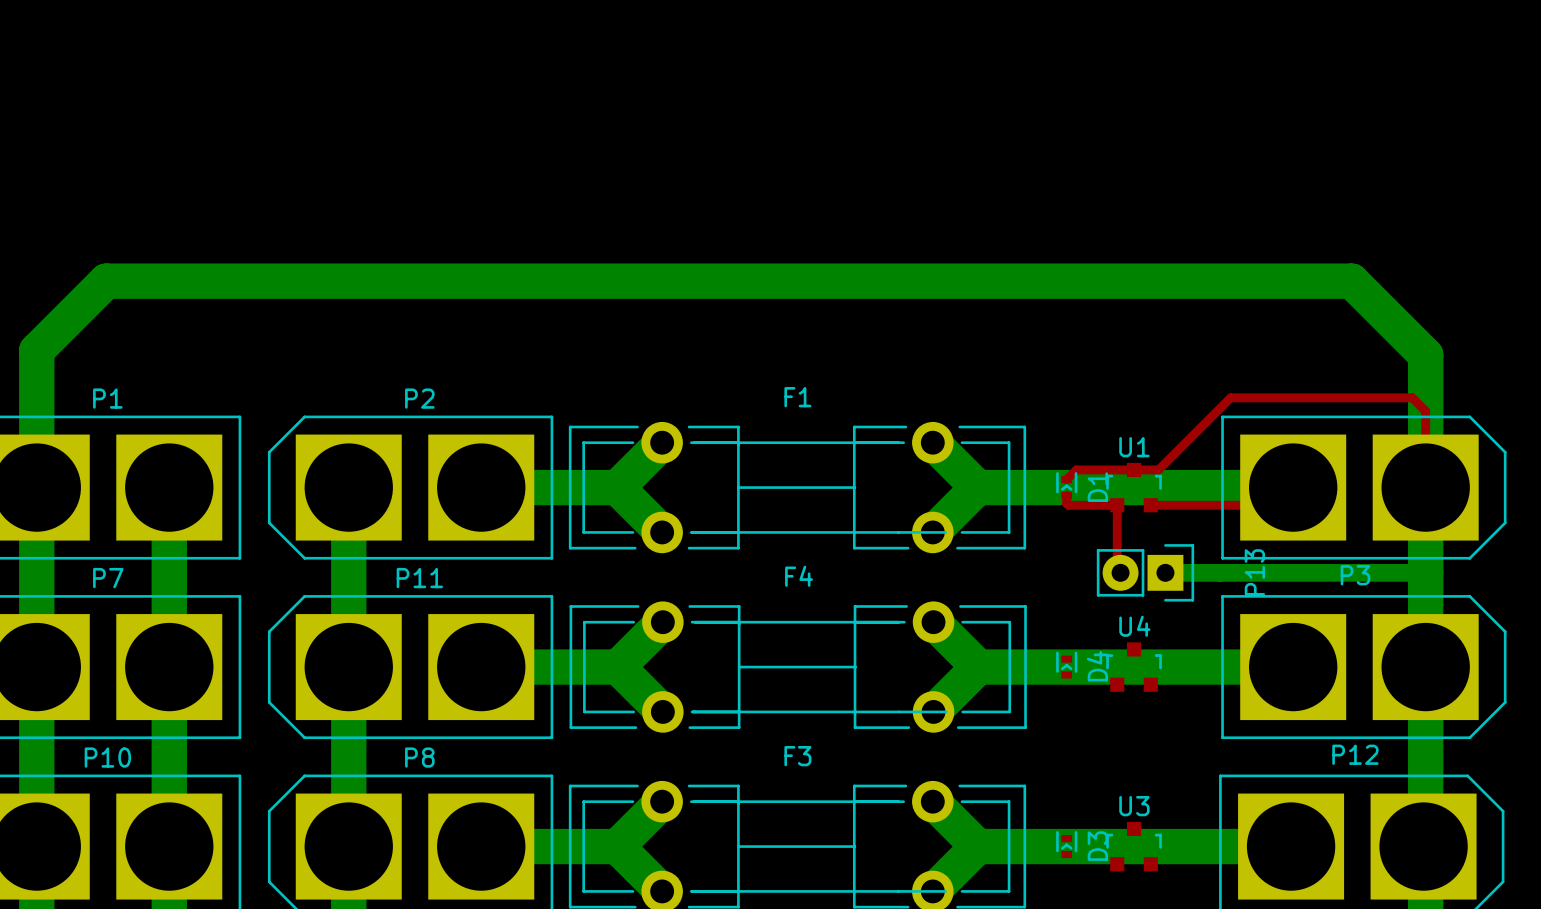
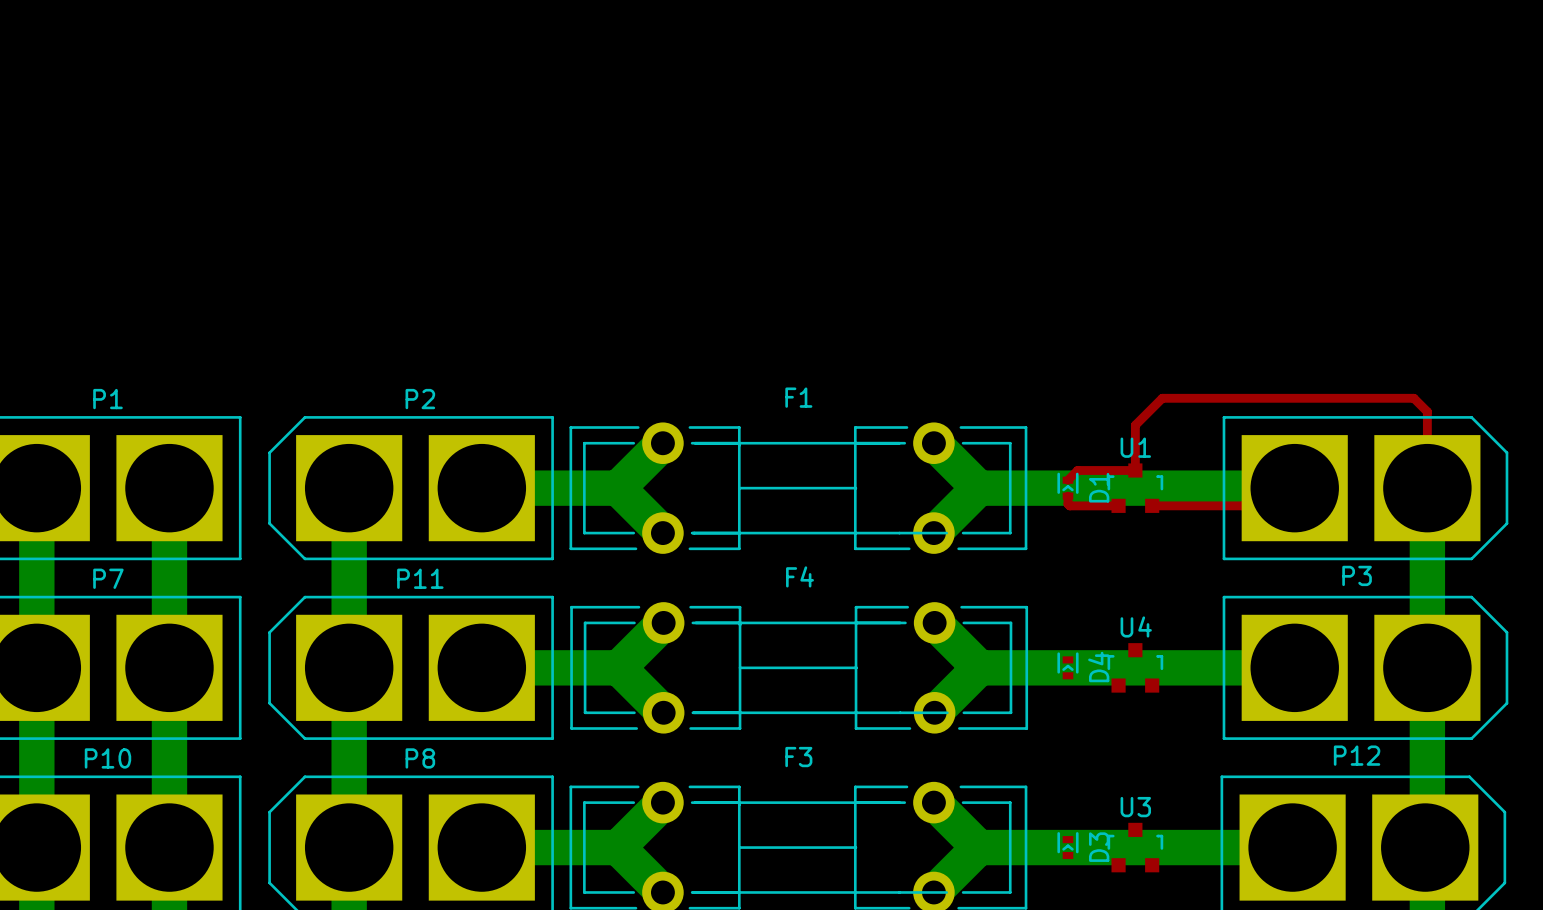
top track: (1230, 397) (1158, 469) (1134, 469) -> (1232, 398) (1162, 398) (1135, 425) (1135, 470)
bottom track: (36, 487) (36, 350) (106, 281) (1351, 281) (1425, 355) (1425, 487) -> none
top track: (1117, 505) (1117, 569) (1120, 572) -> none
P13: (1145, 572) -> none
bottom track: (1165, 572) (1425, 572) -> none

